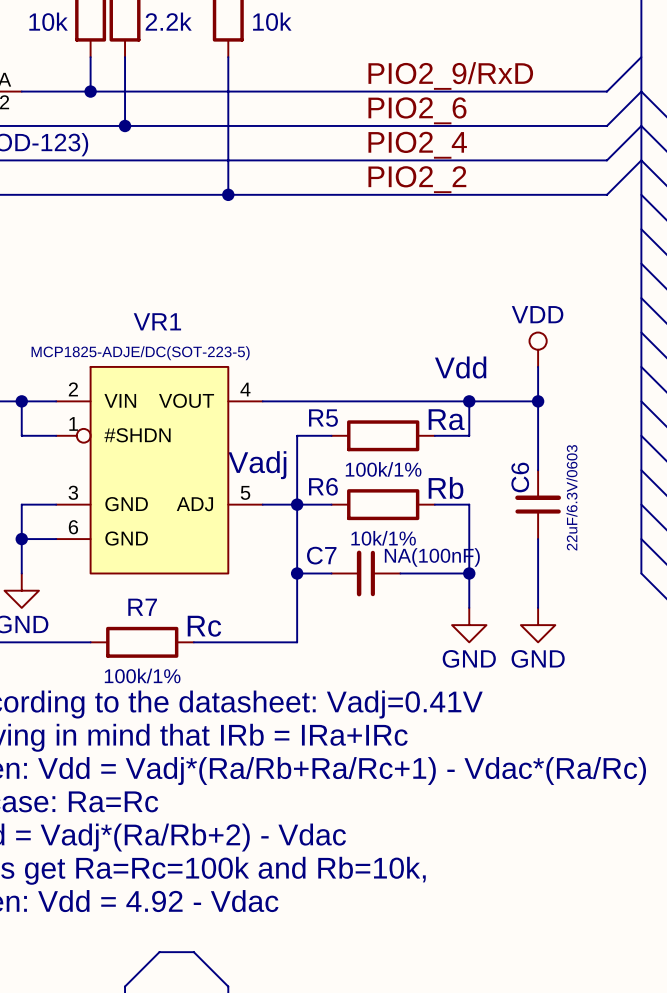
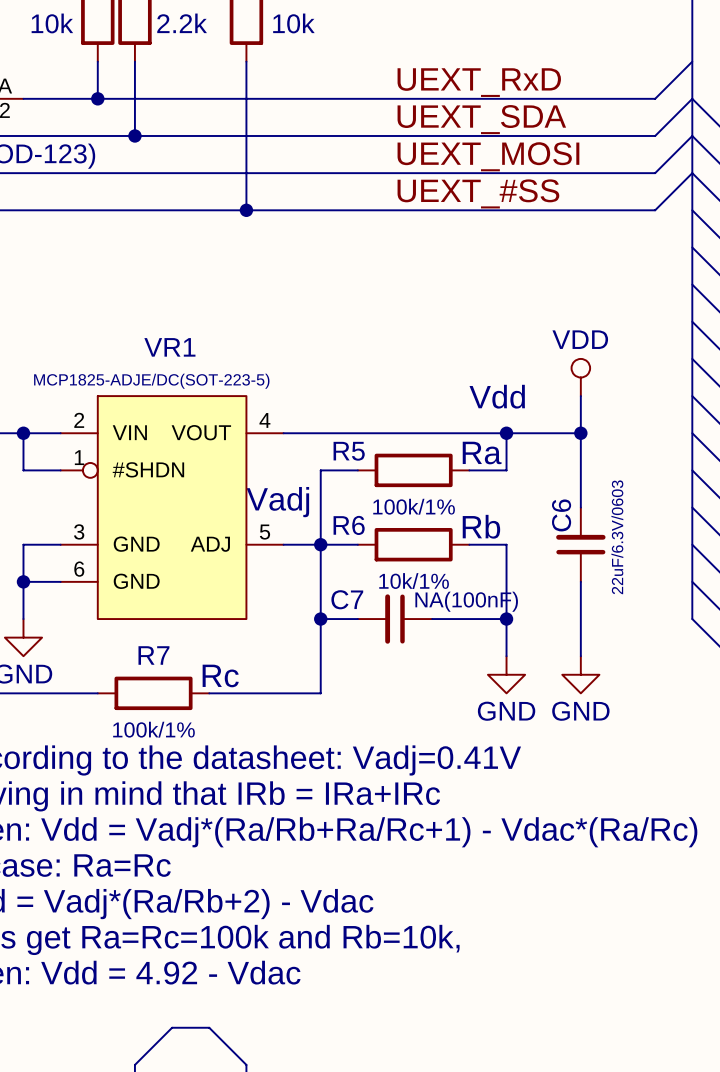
label: PIO2_9/RxD (450, 75) -> UEXT_RxD (479, 82)
label: PIO2_6 (417, 110) -> UEXT_SDA (481, 119)
label: PIO2_4 (417, 145) -> UEXT_MOSI (488, 156)
label: PIO2_2 (417, 179) -> UEXT_#SS (478, 193)

